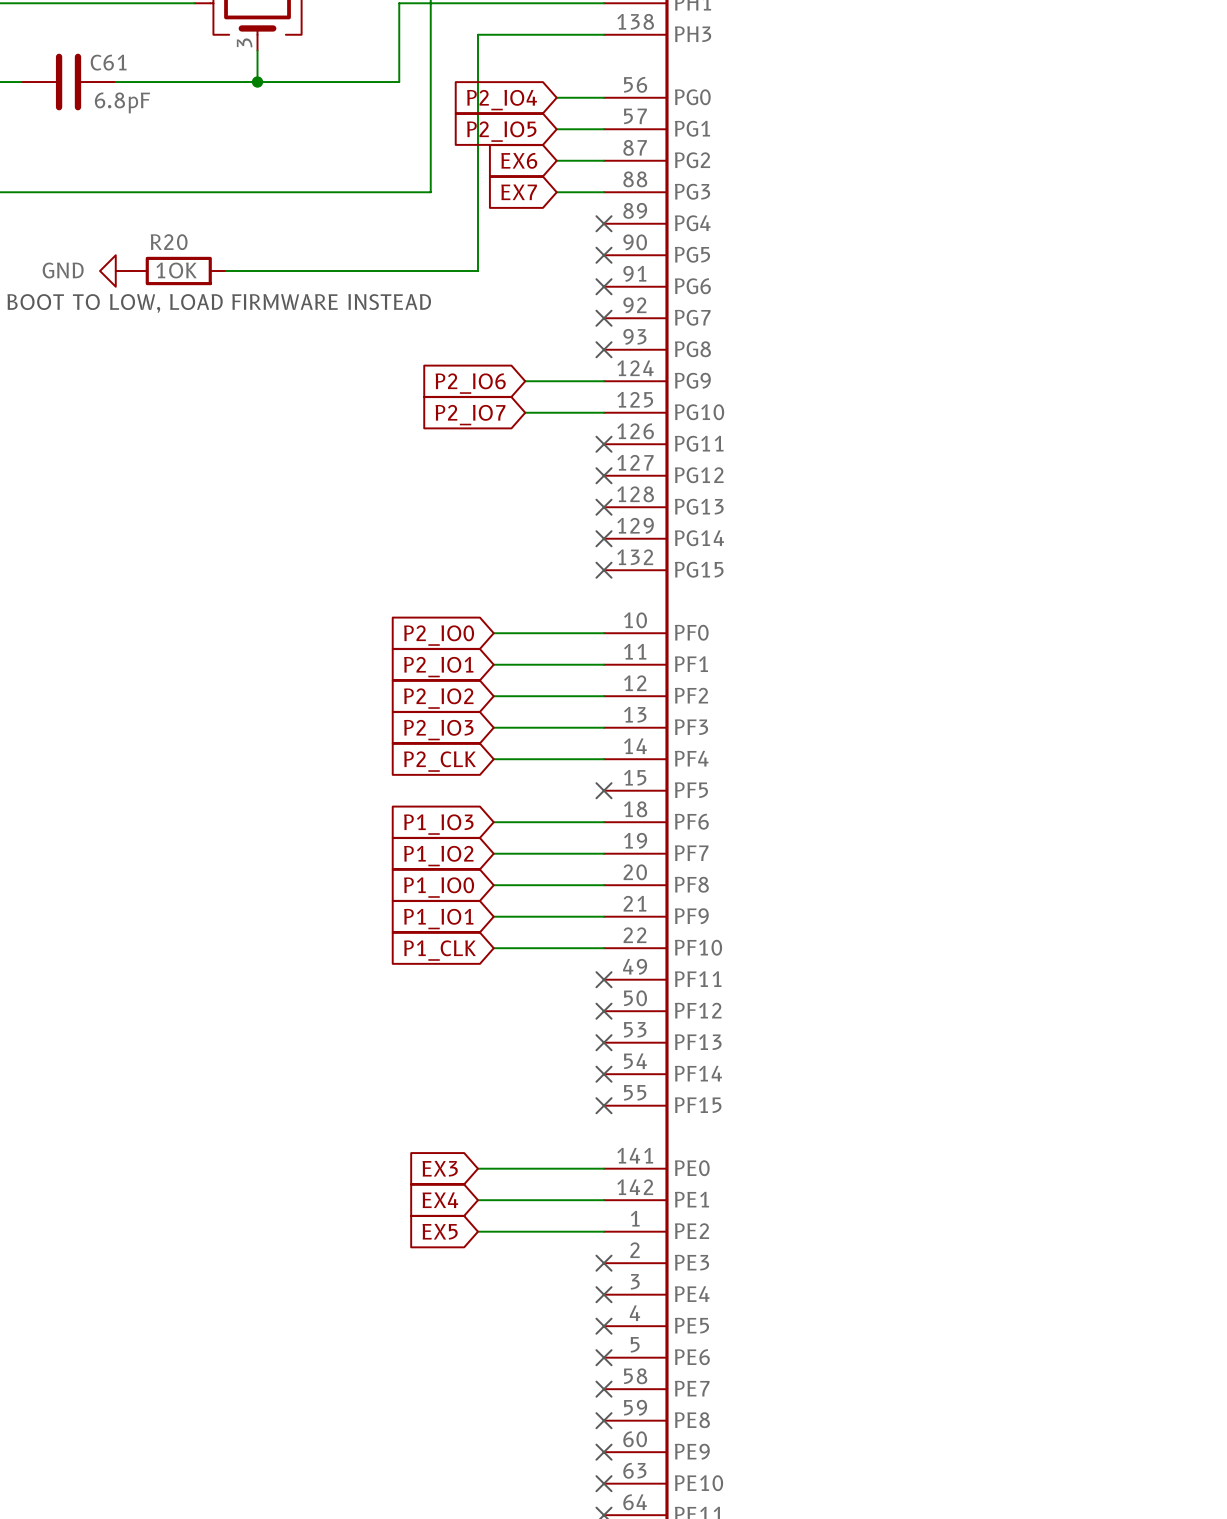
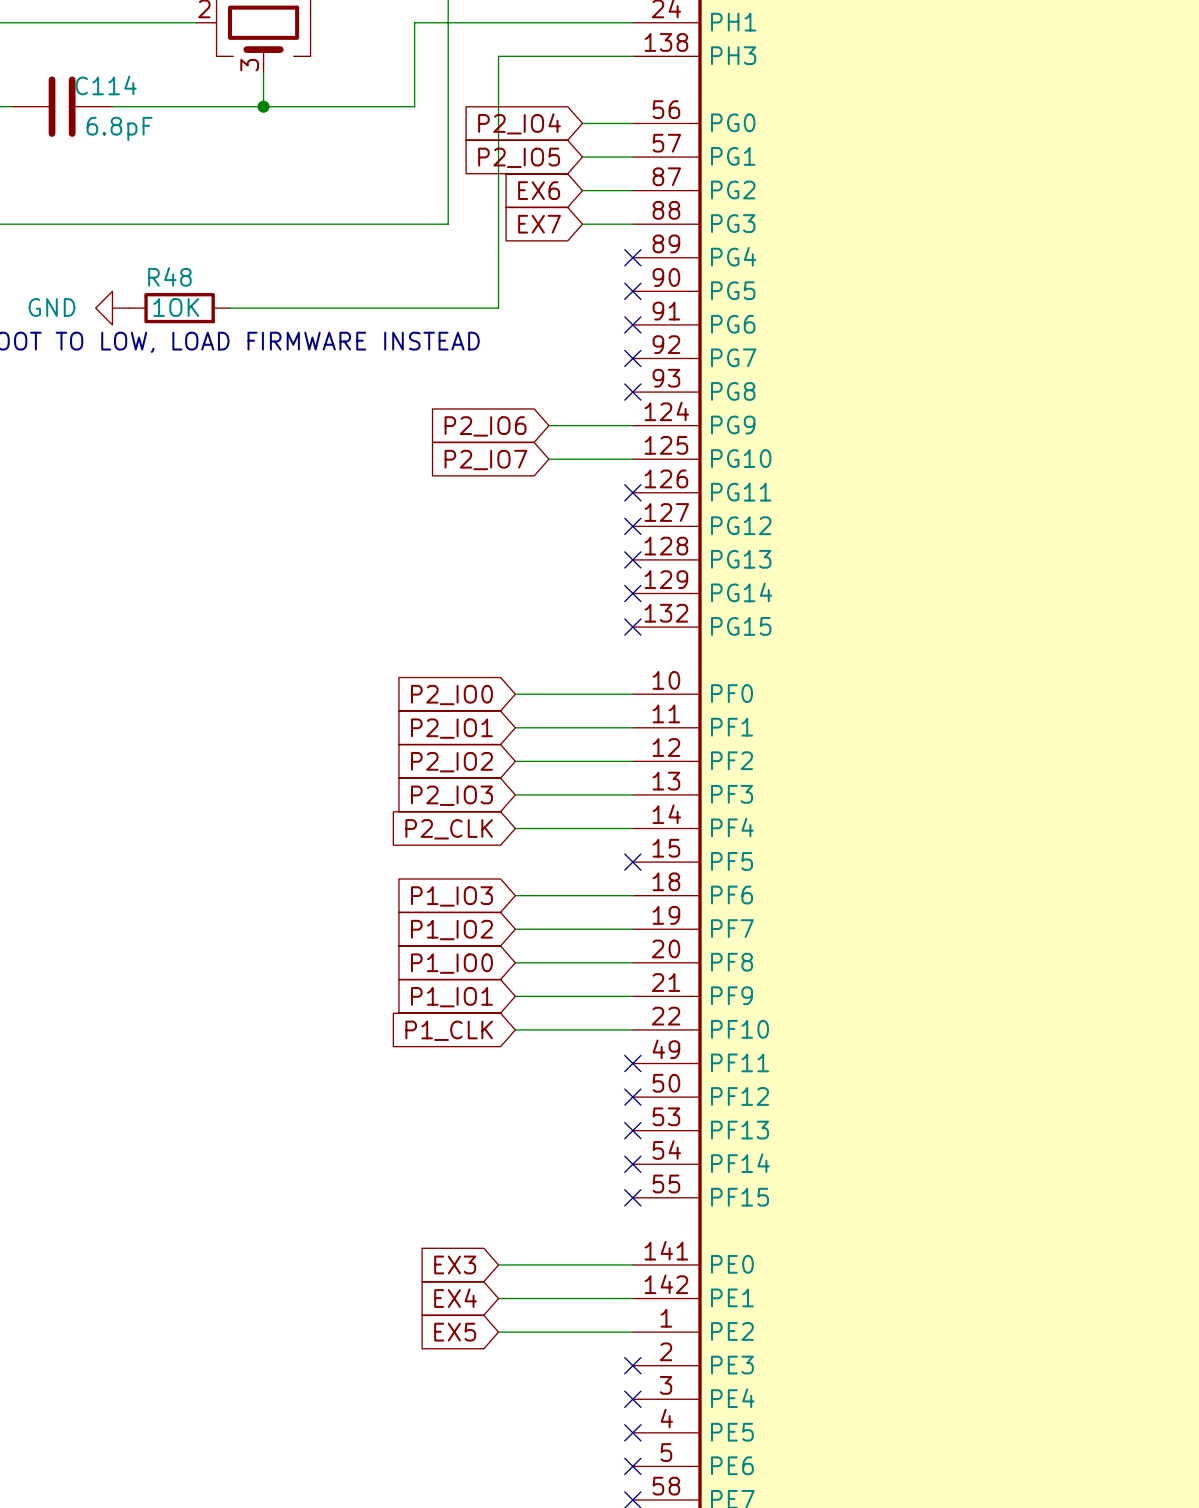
C61 name: C61 (108, 62) -> C114 (106, 85)
R20 name: R20 (169, 242) -> R48 (169, 276)

